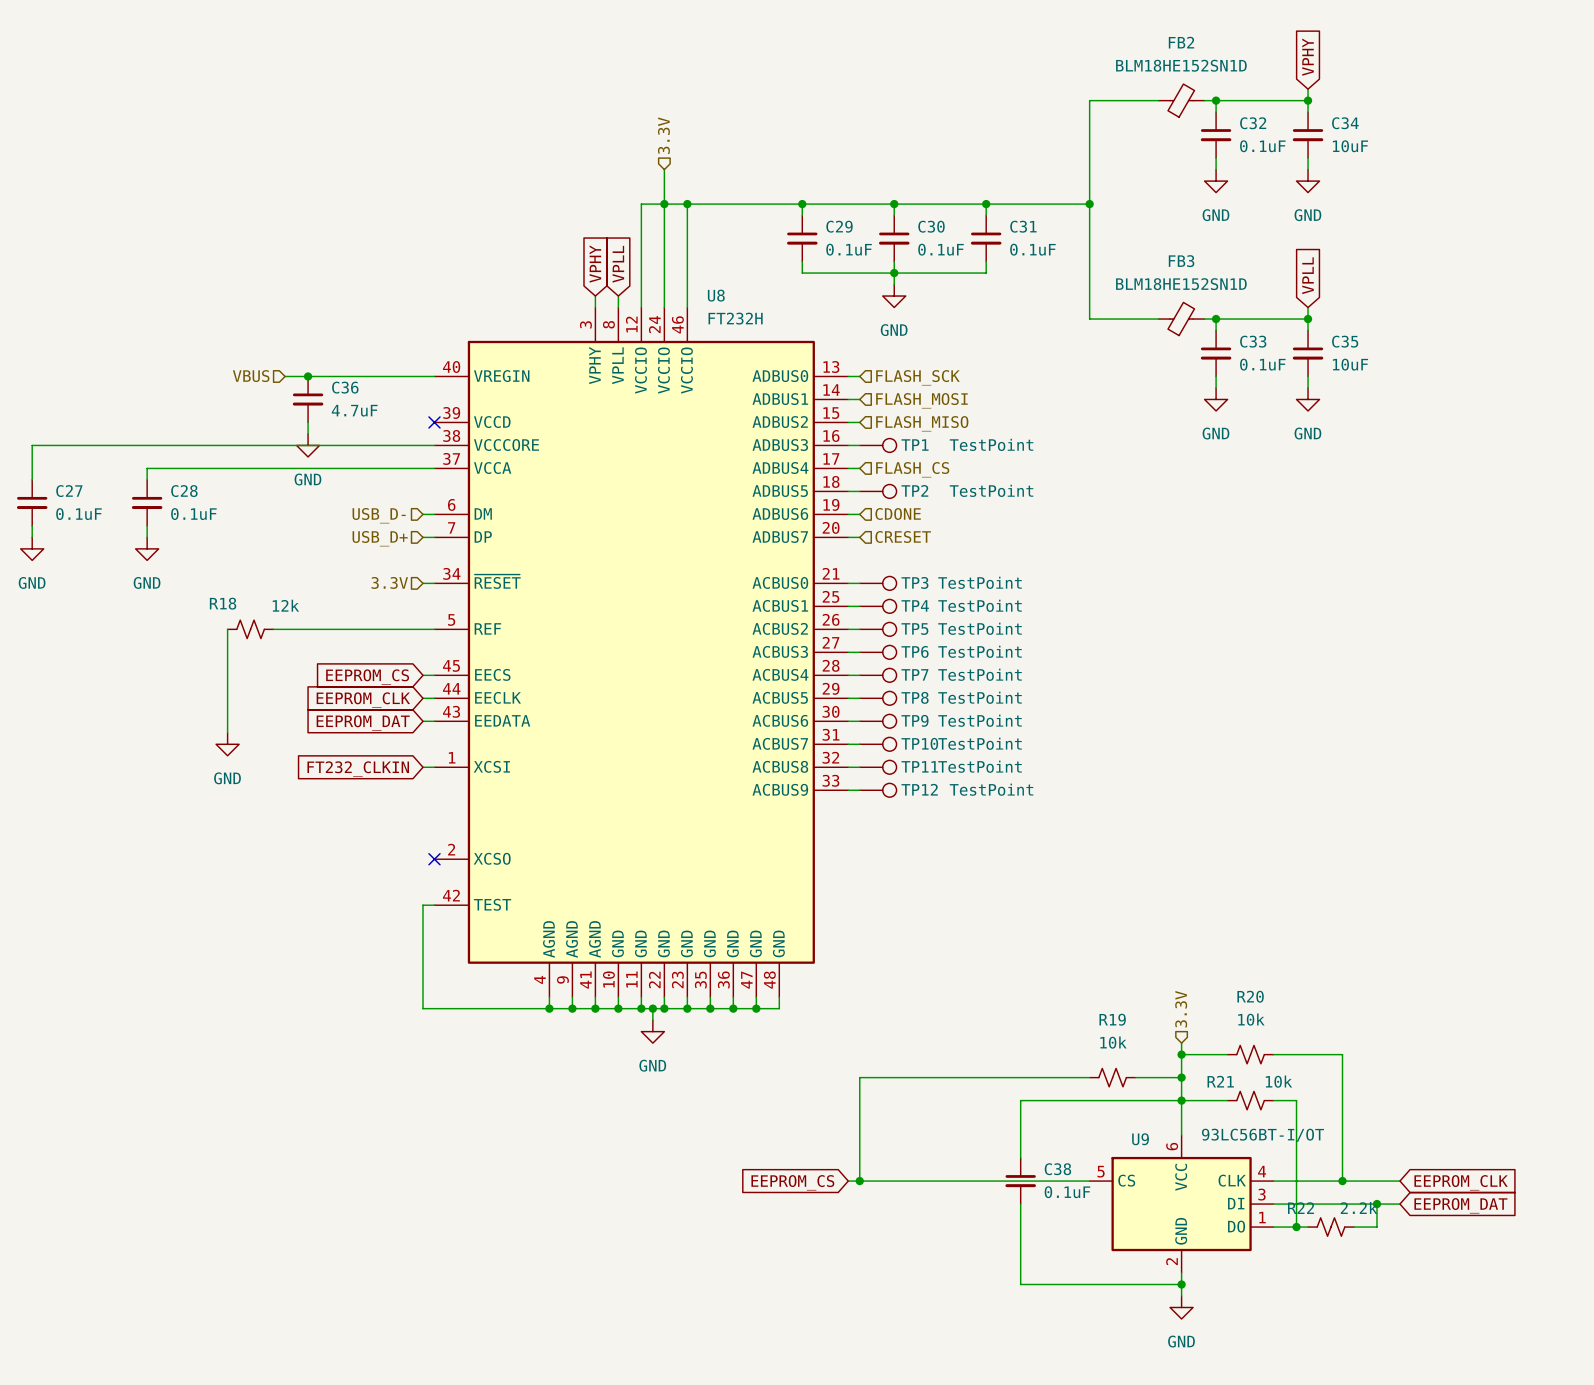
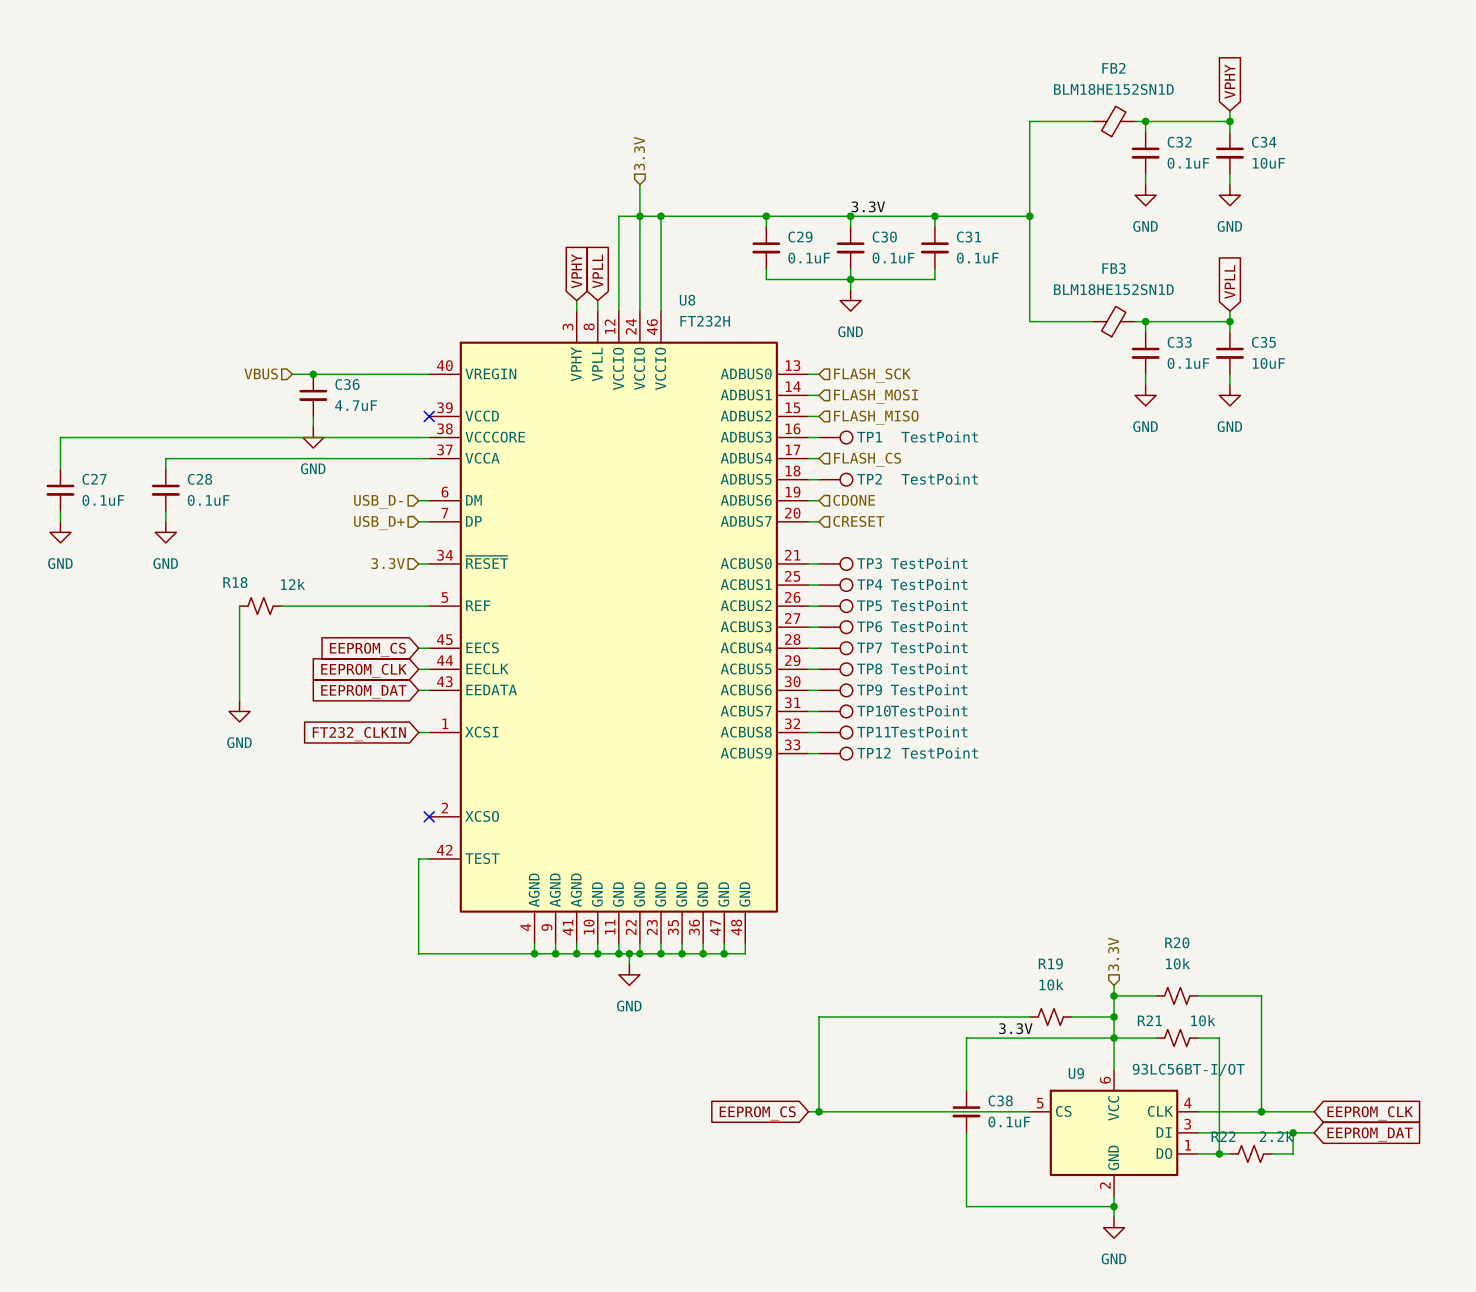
label: none -> 3.3V (868, 206)
label: none -> 3.3V (1015, 1028)

